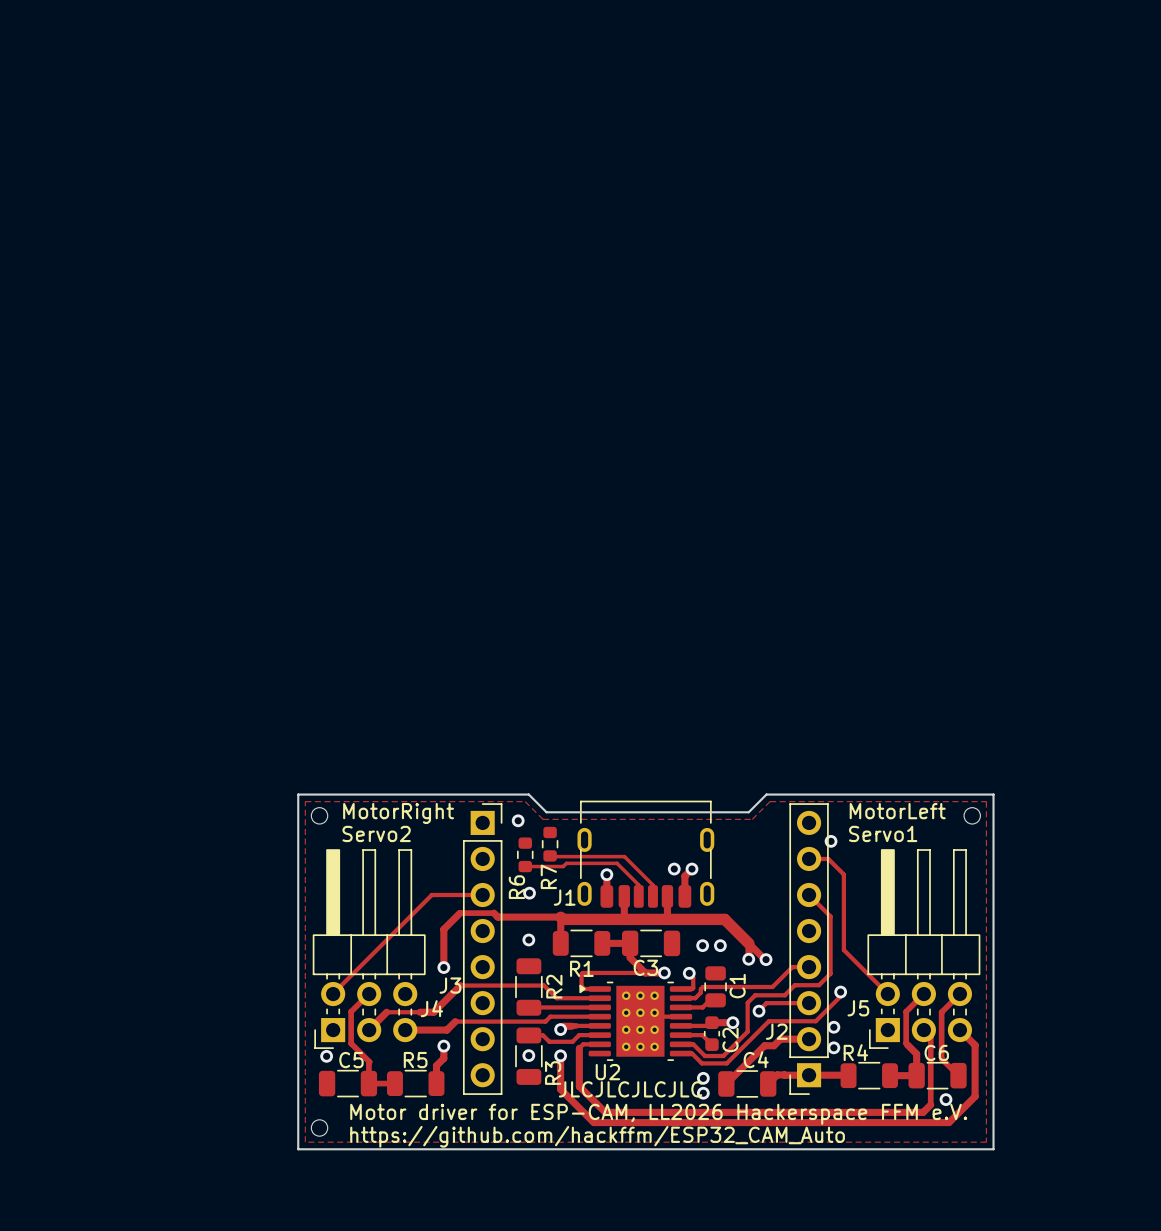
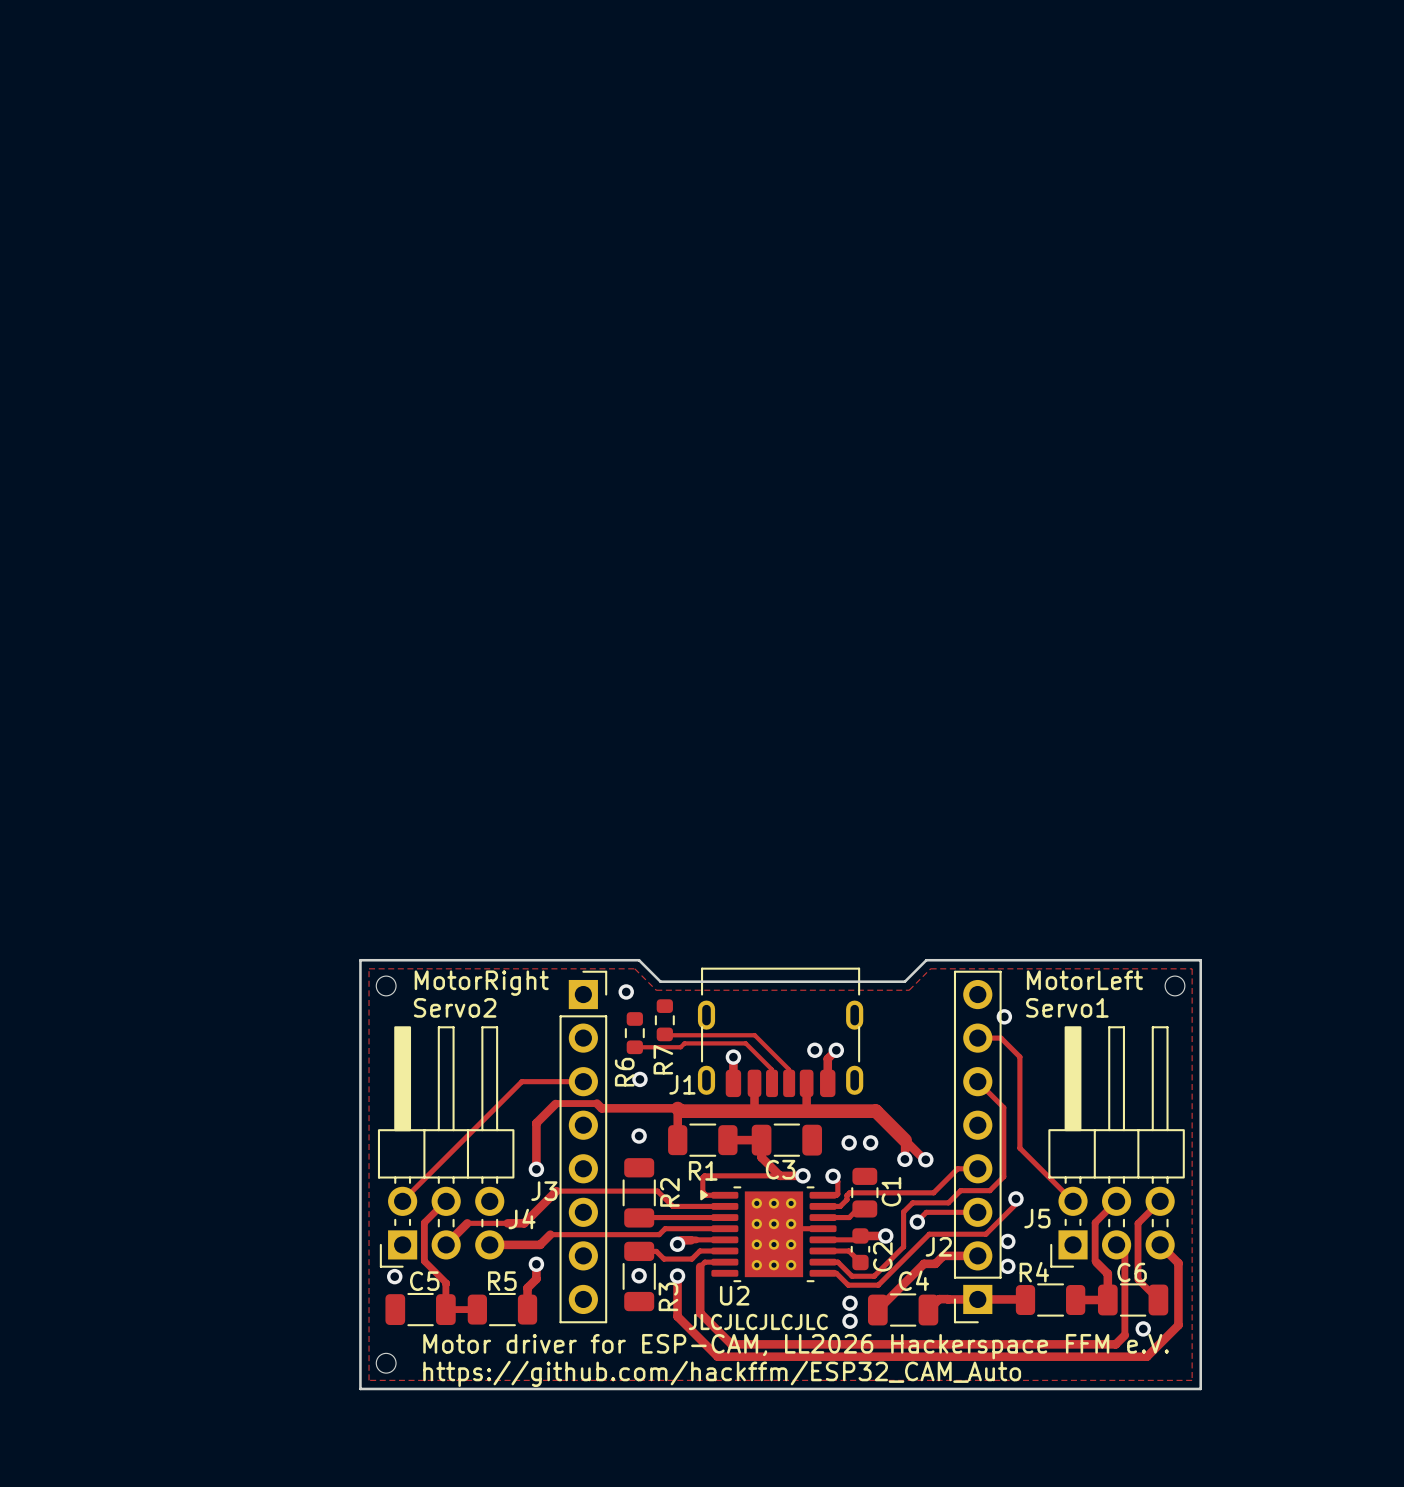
drawing: none -> [688, 1313, 828, 1331]
text: JLCJLCJLCJLC (630, 1089) -> none

